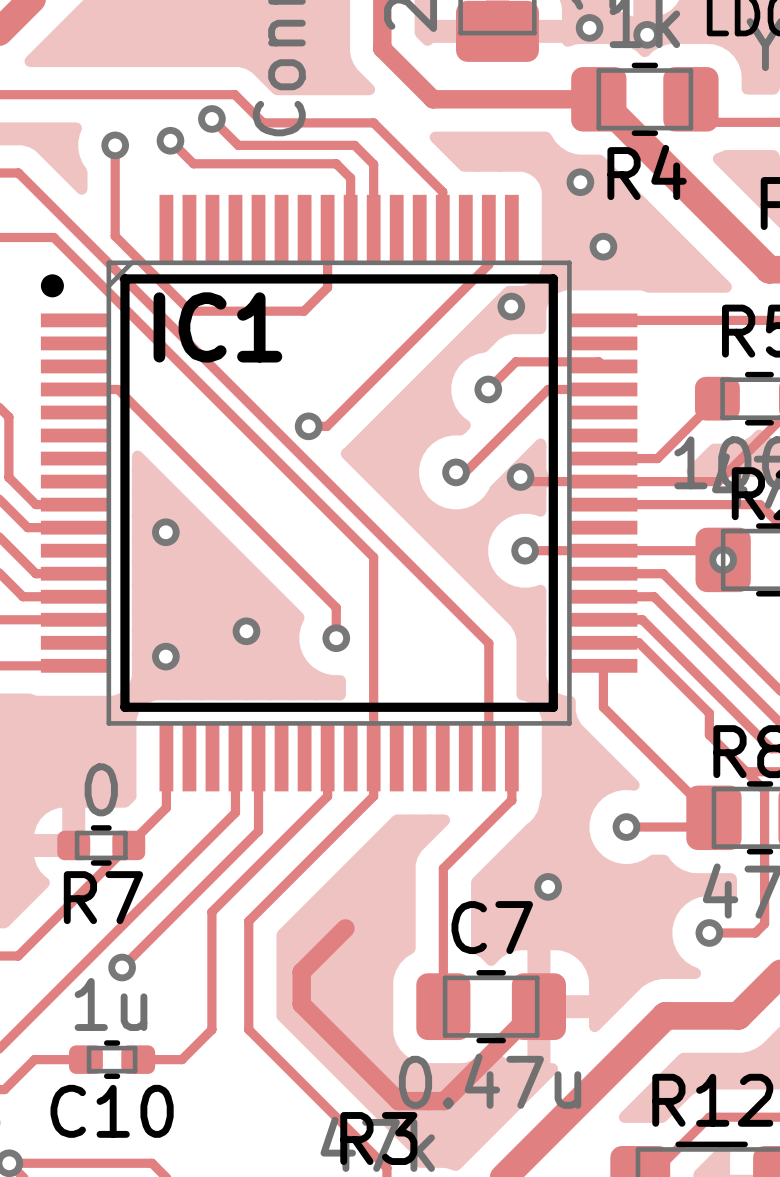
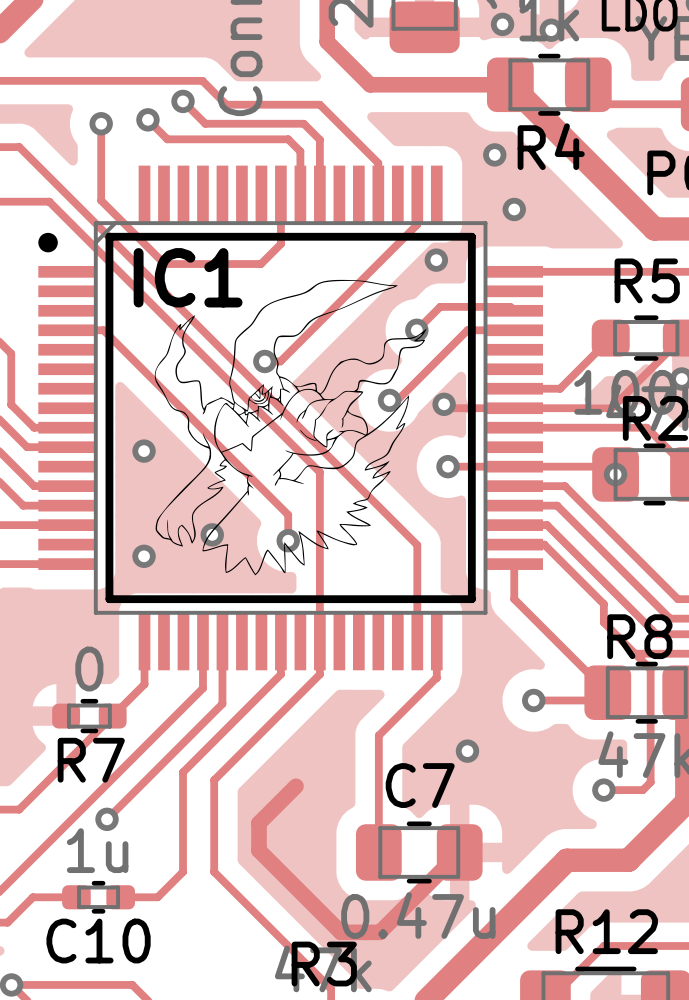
drawing: none -> [154, 279, 427, 576]

